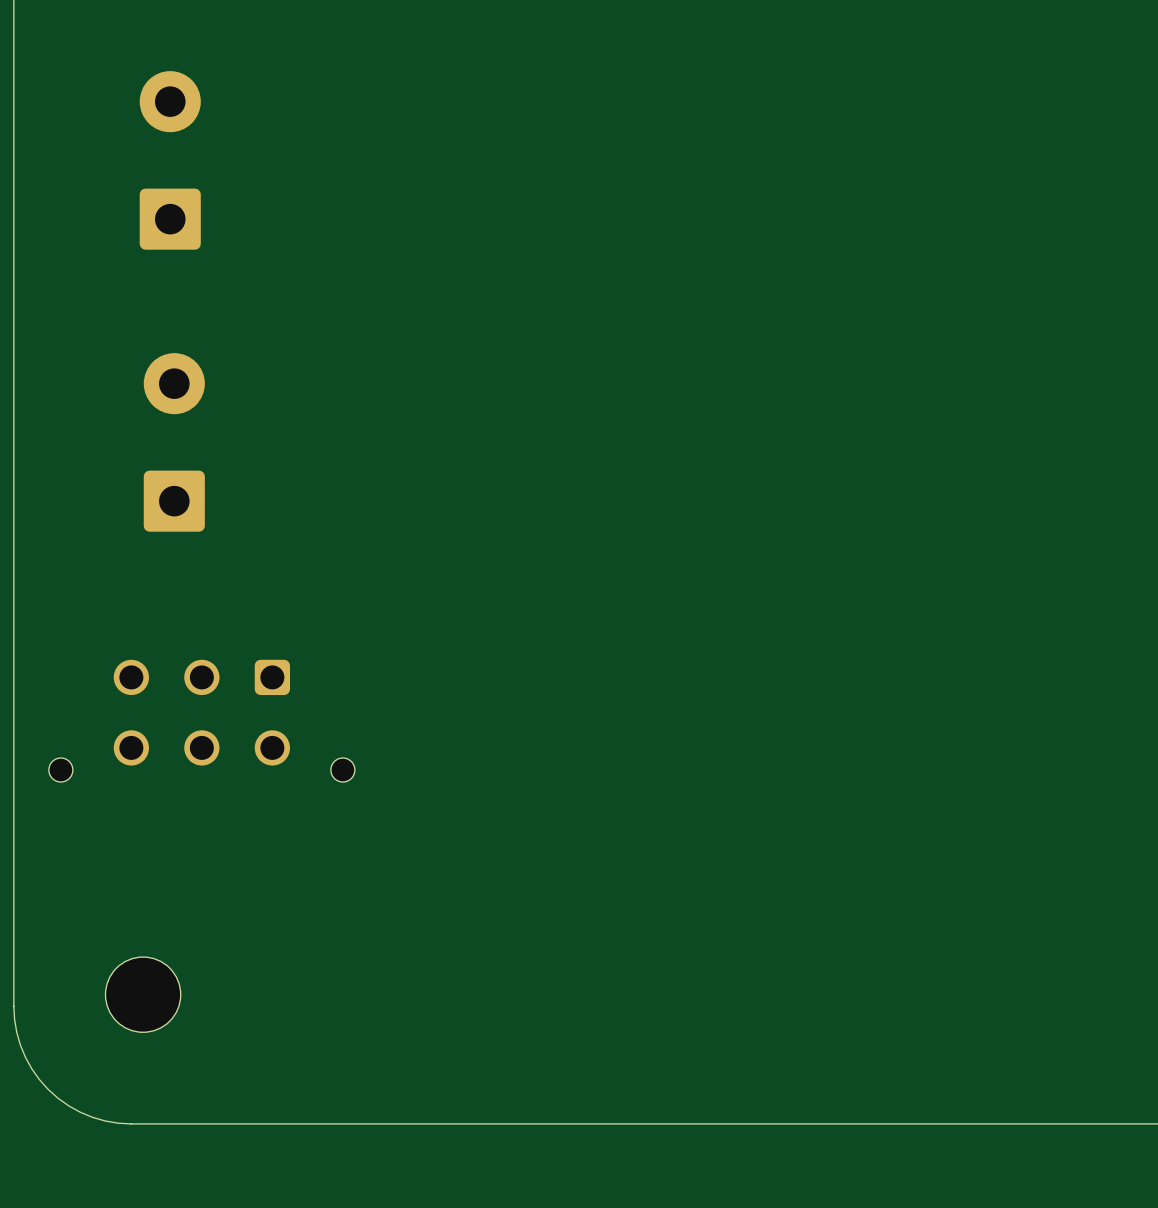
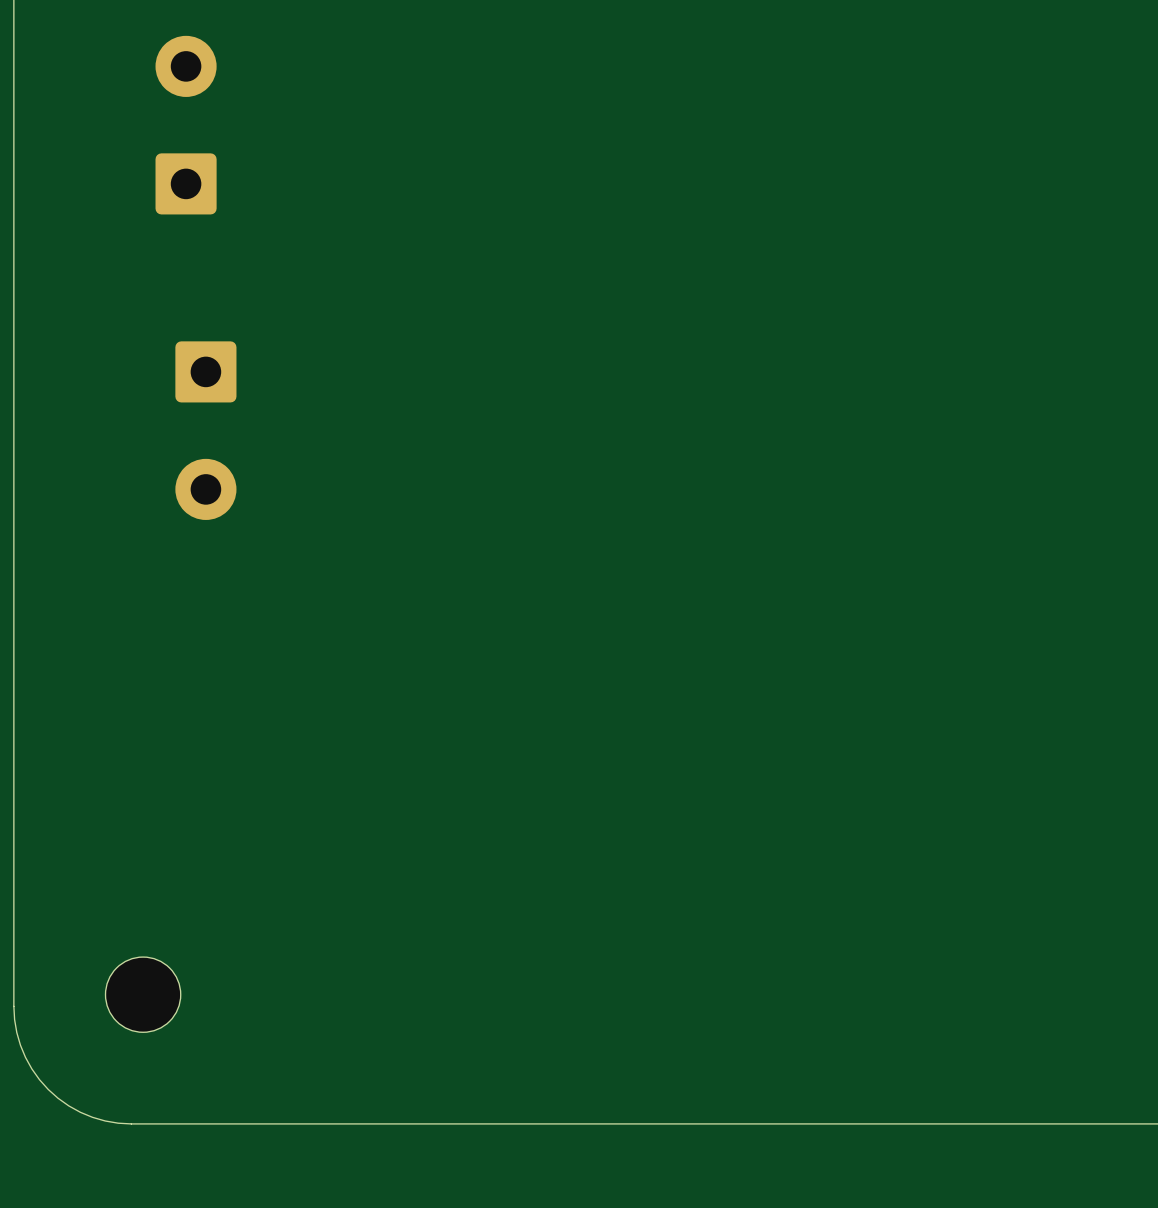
part position: (170, 160) -> (186, 125)
part rotation: 0° (174, 442) -> 180° (205, 430)
part: (201, 720) -> none

